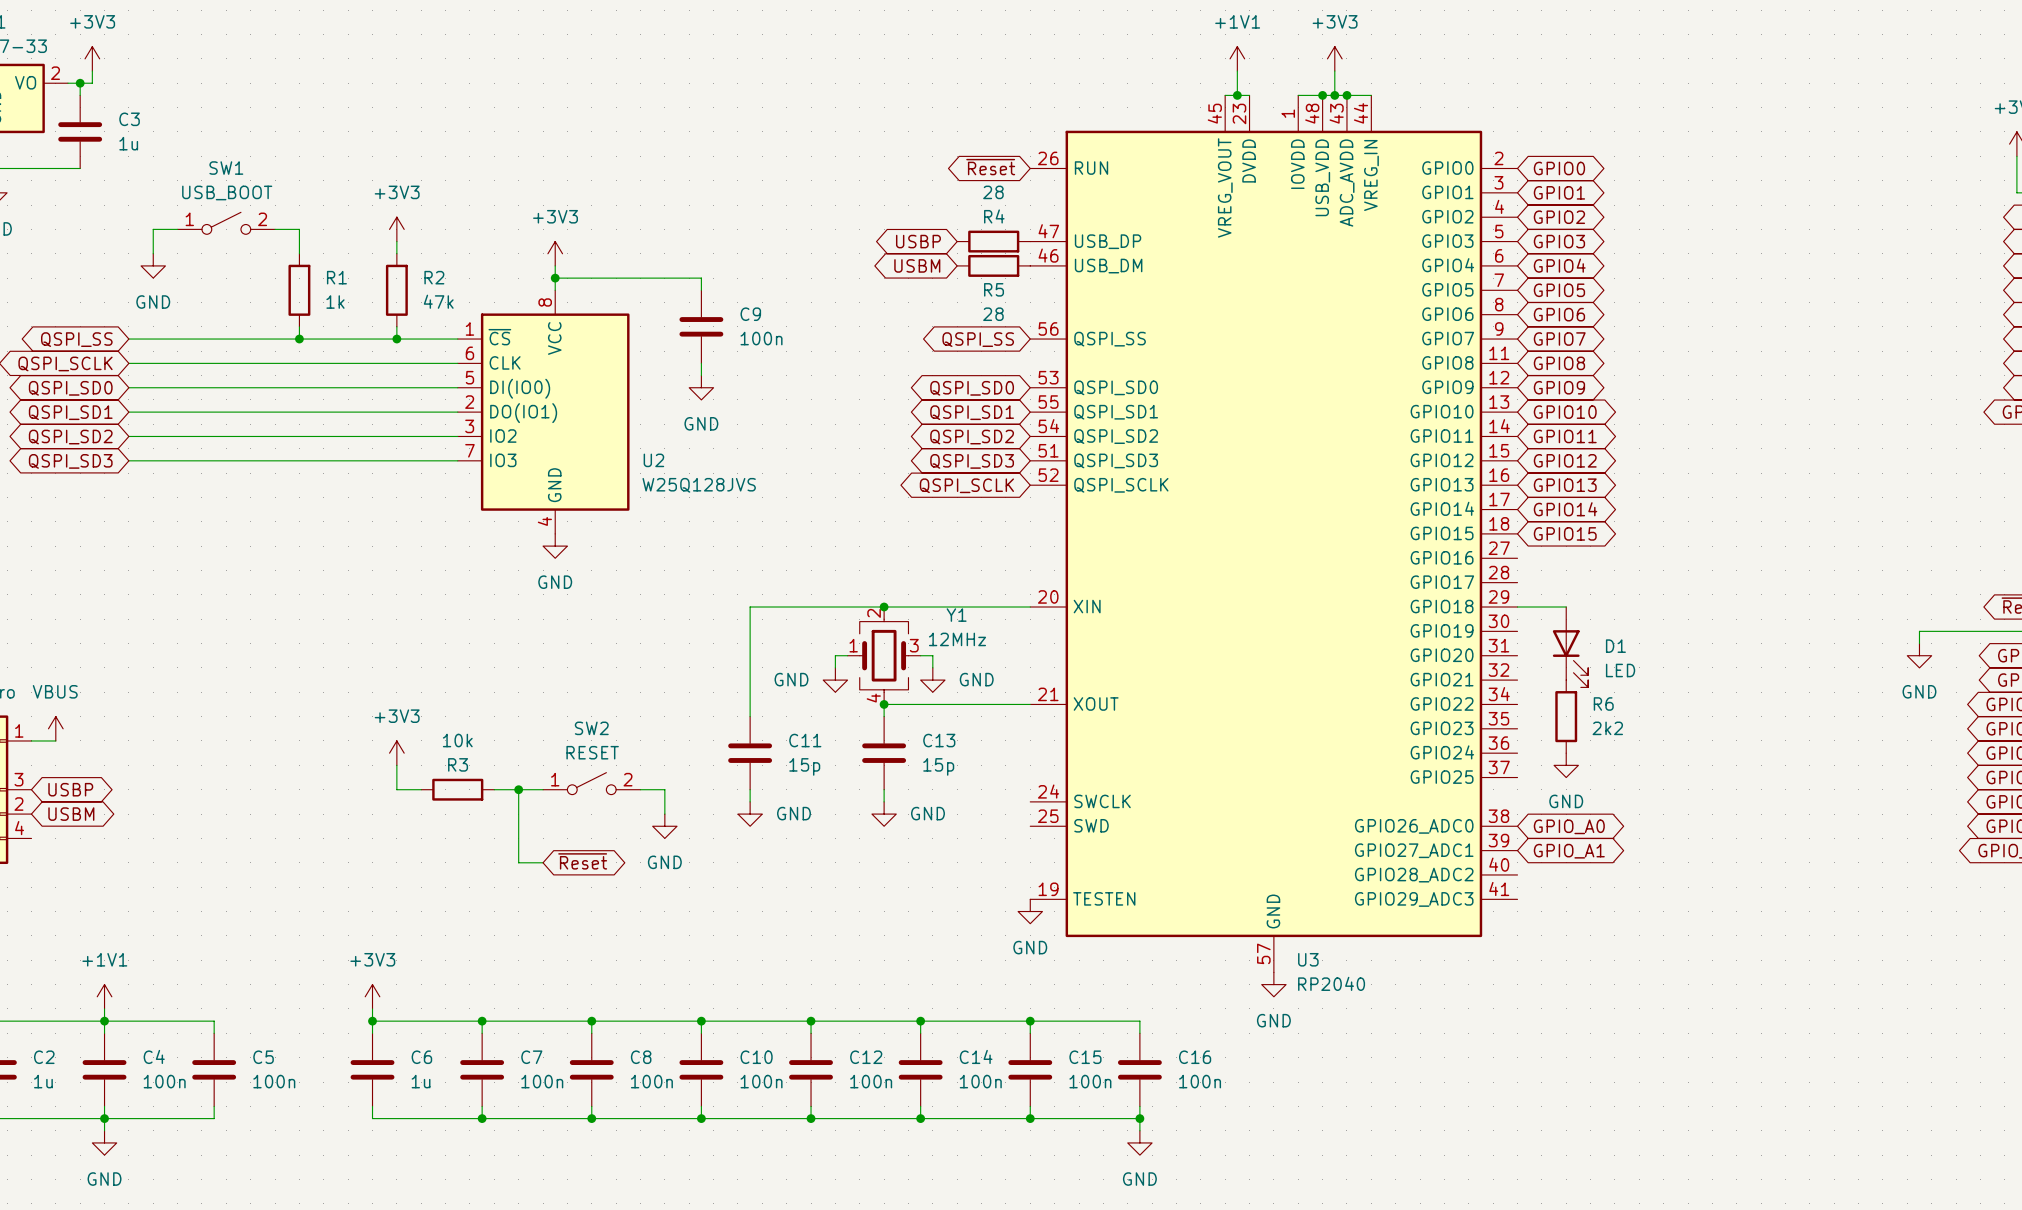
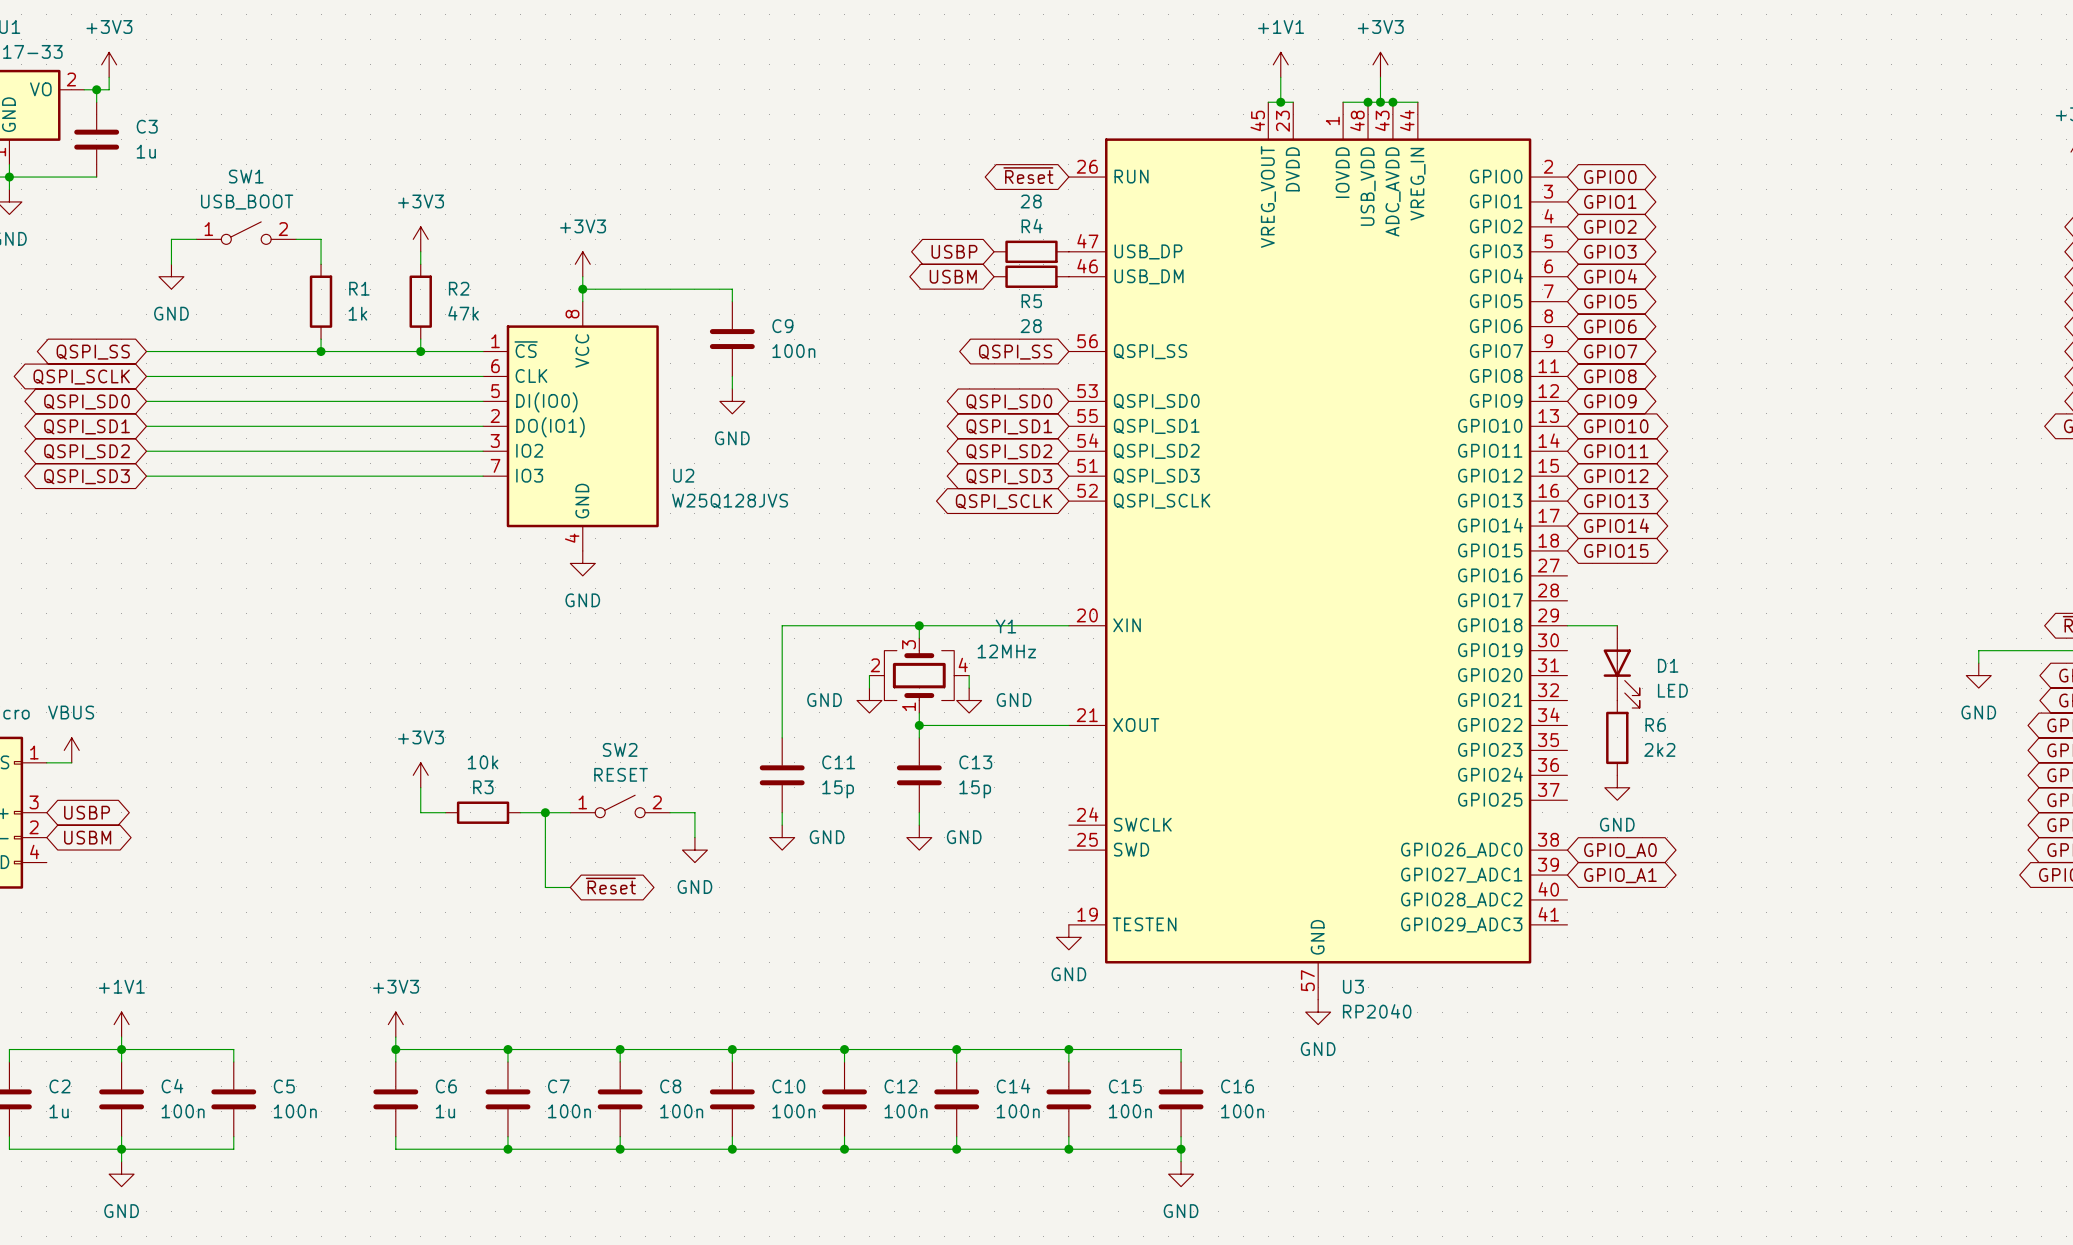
Y1 rotation: 0° (884, 655) -> 90° counterclockwise (919, 675)

